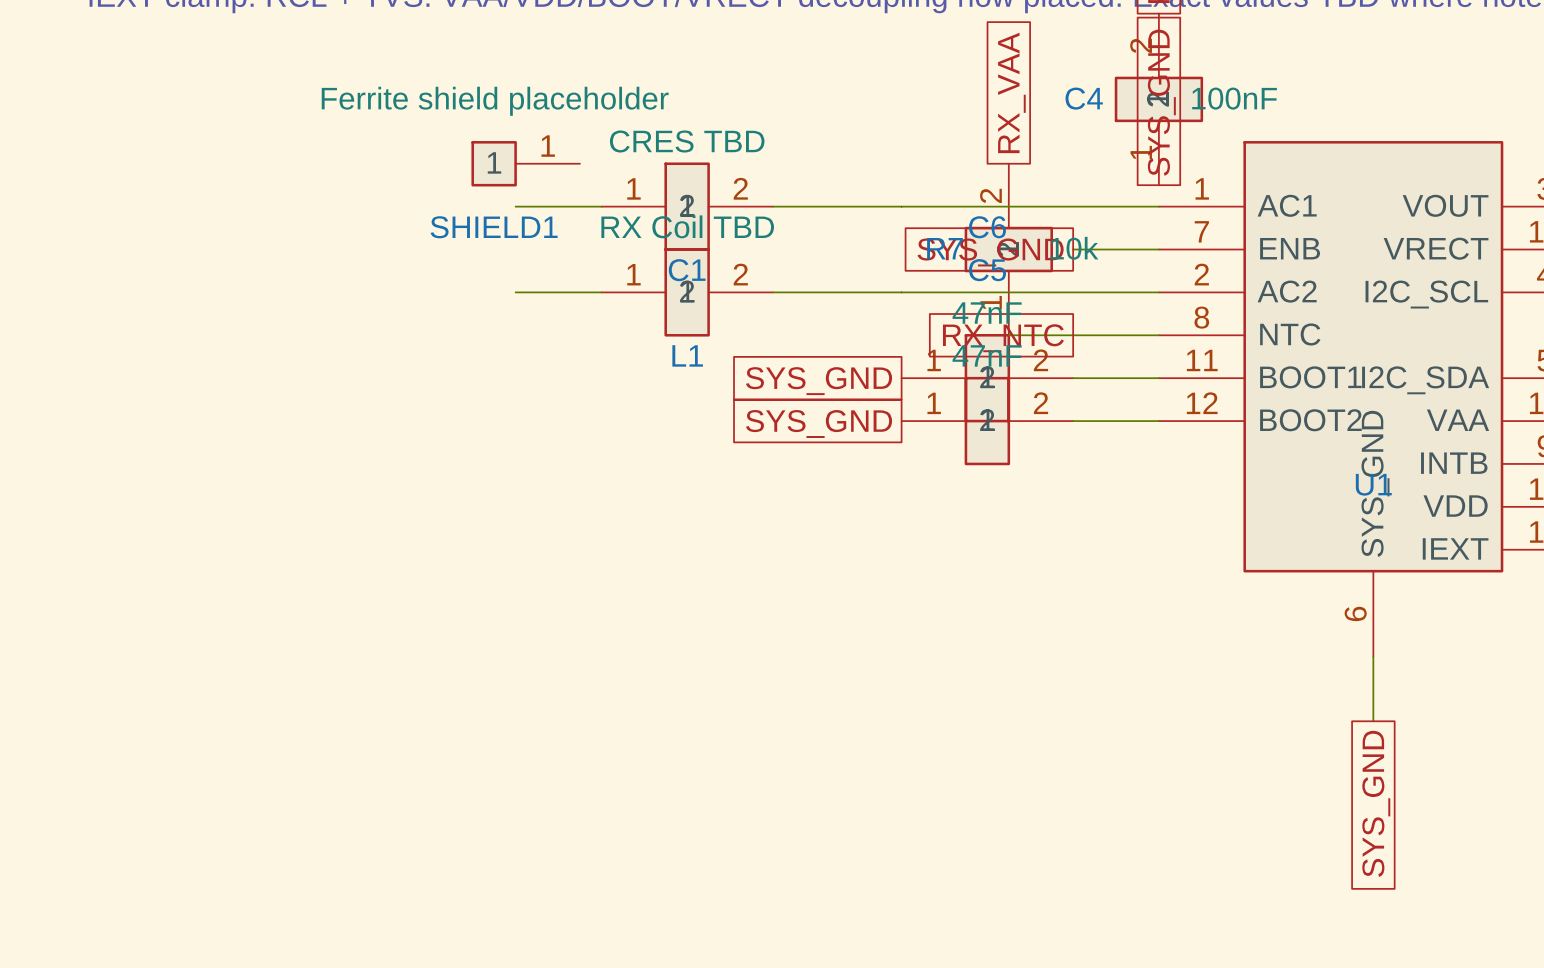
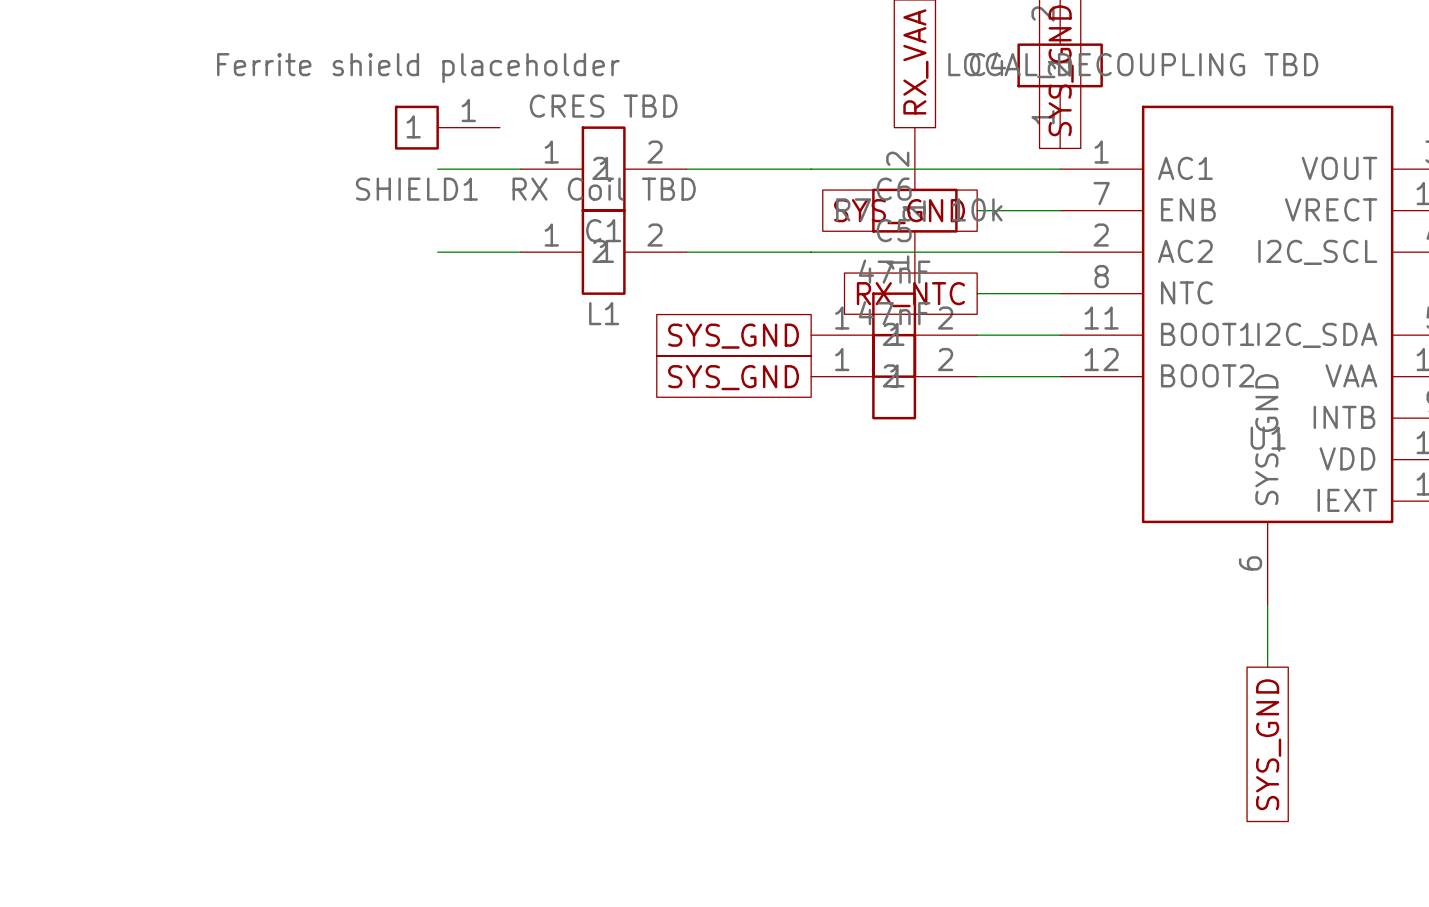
C4 value: 100nF (1234, 98) -> LOCAL_DECOUPLING TBD (1133, 65)
wire: (1008, 335) (1073, 335) -> none

